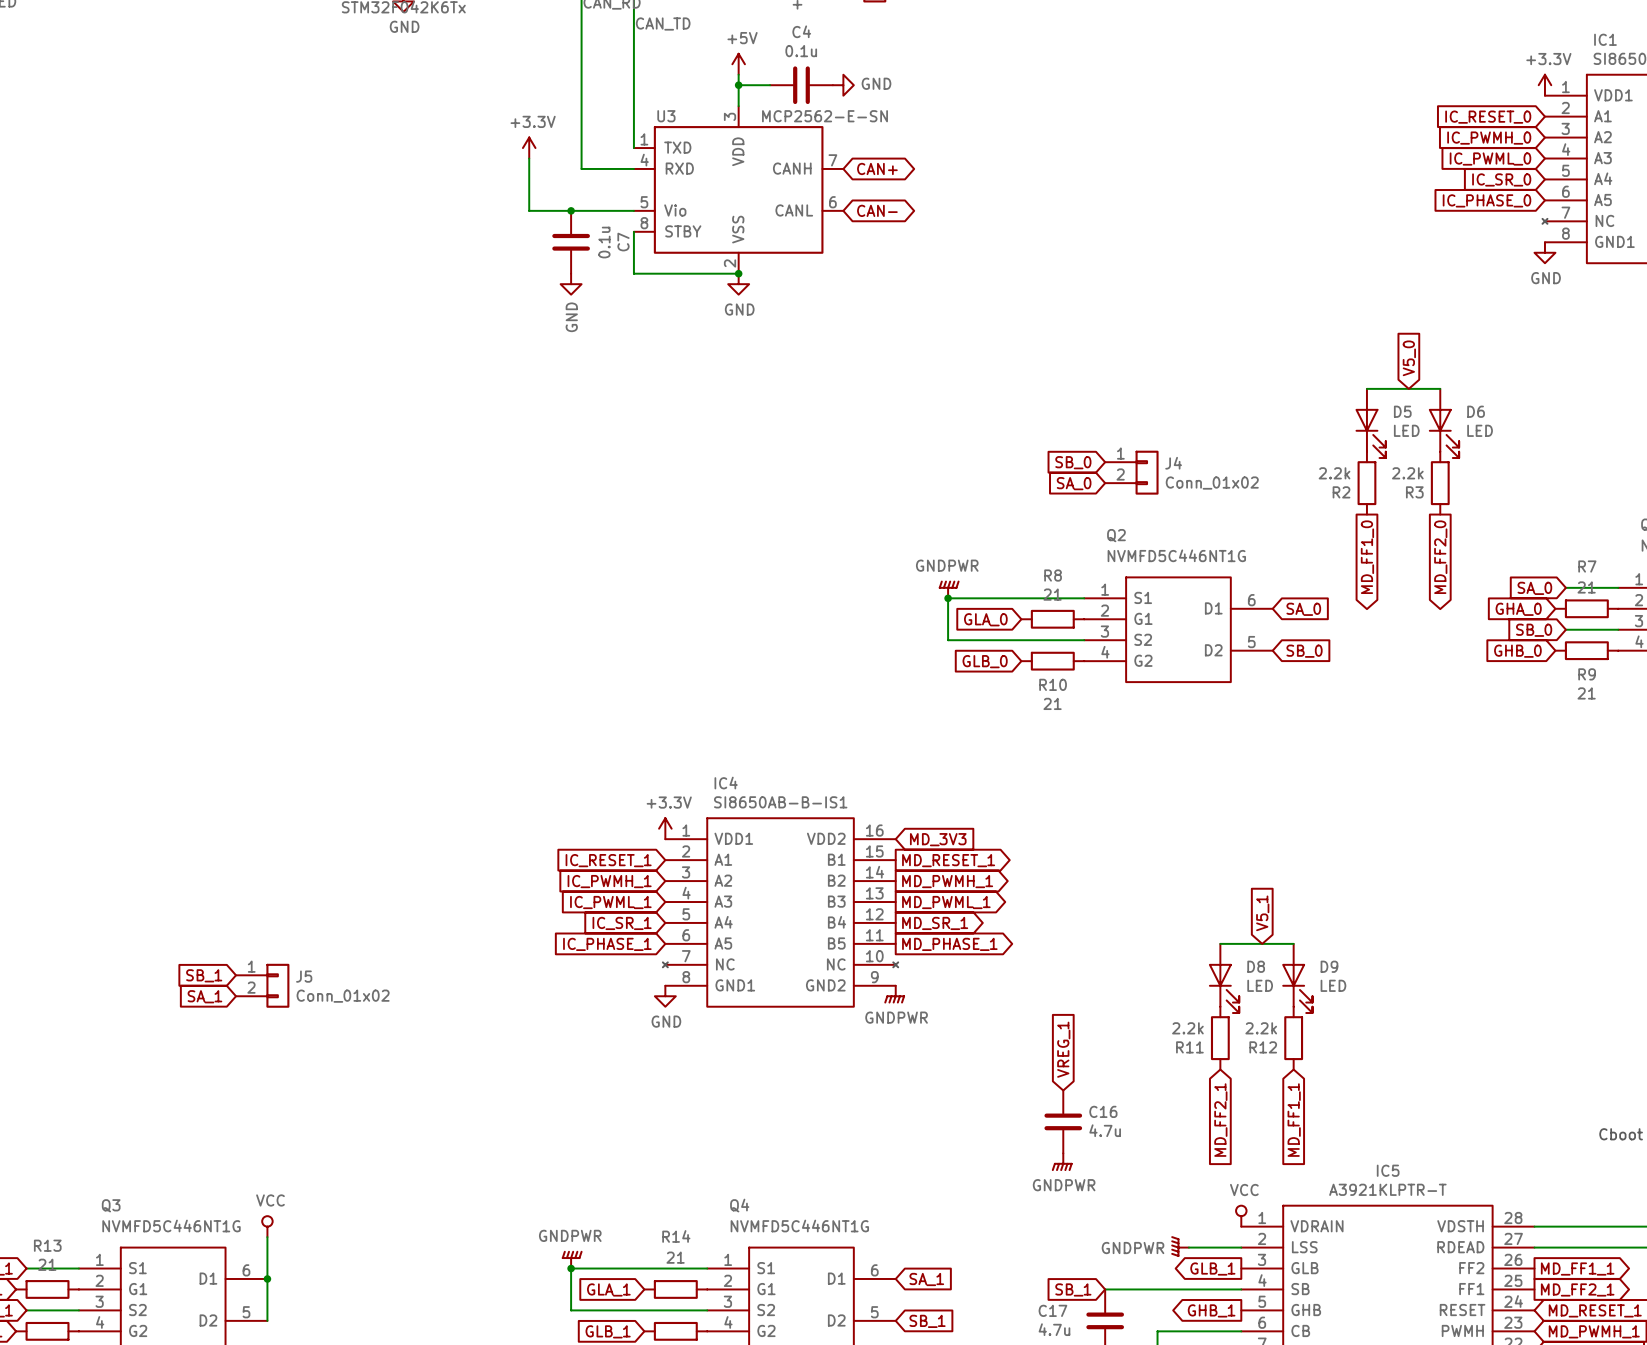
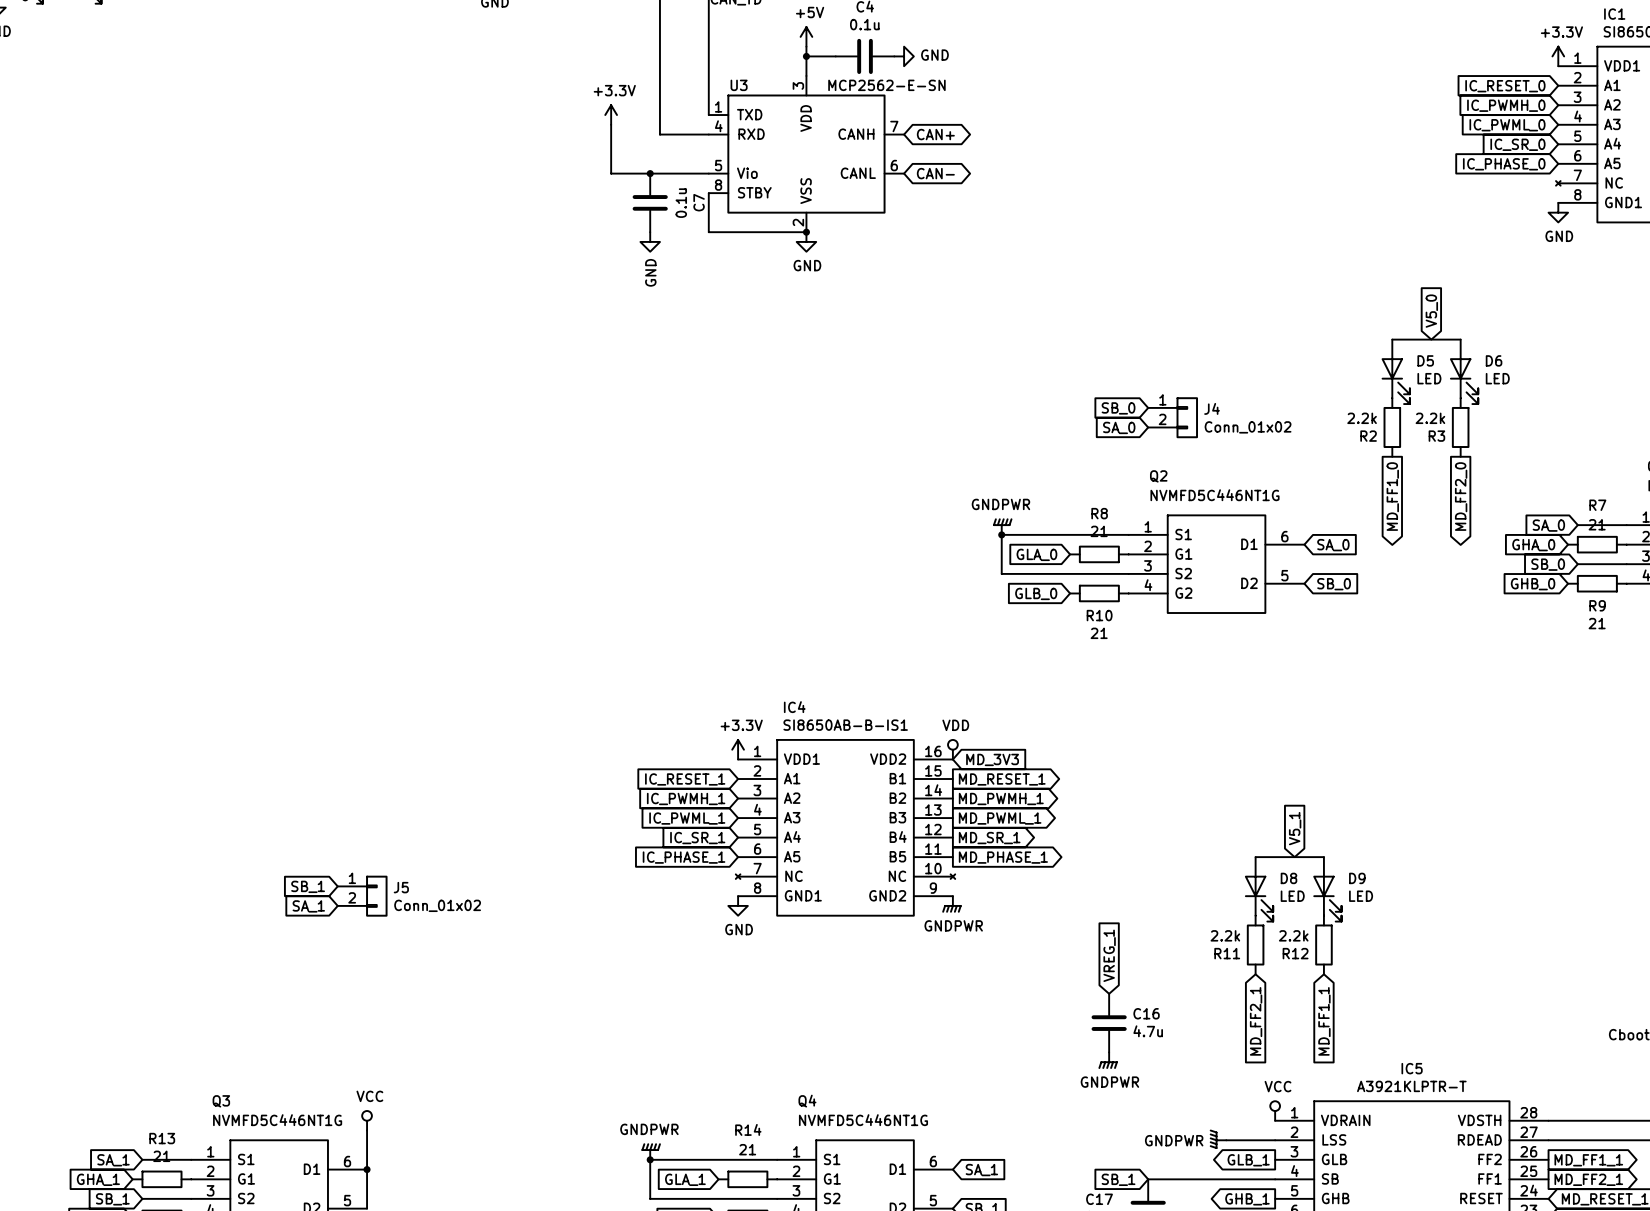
power symbol: none -> VDD (952, 749)

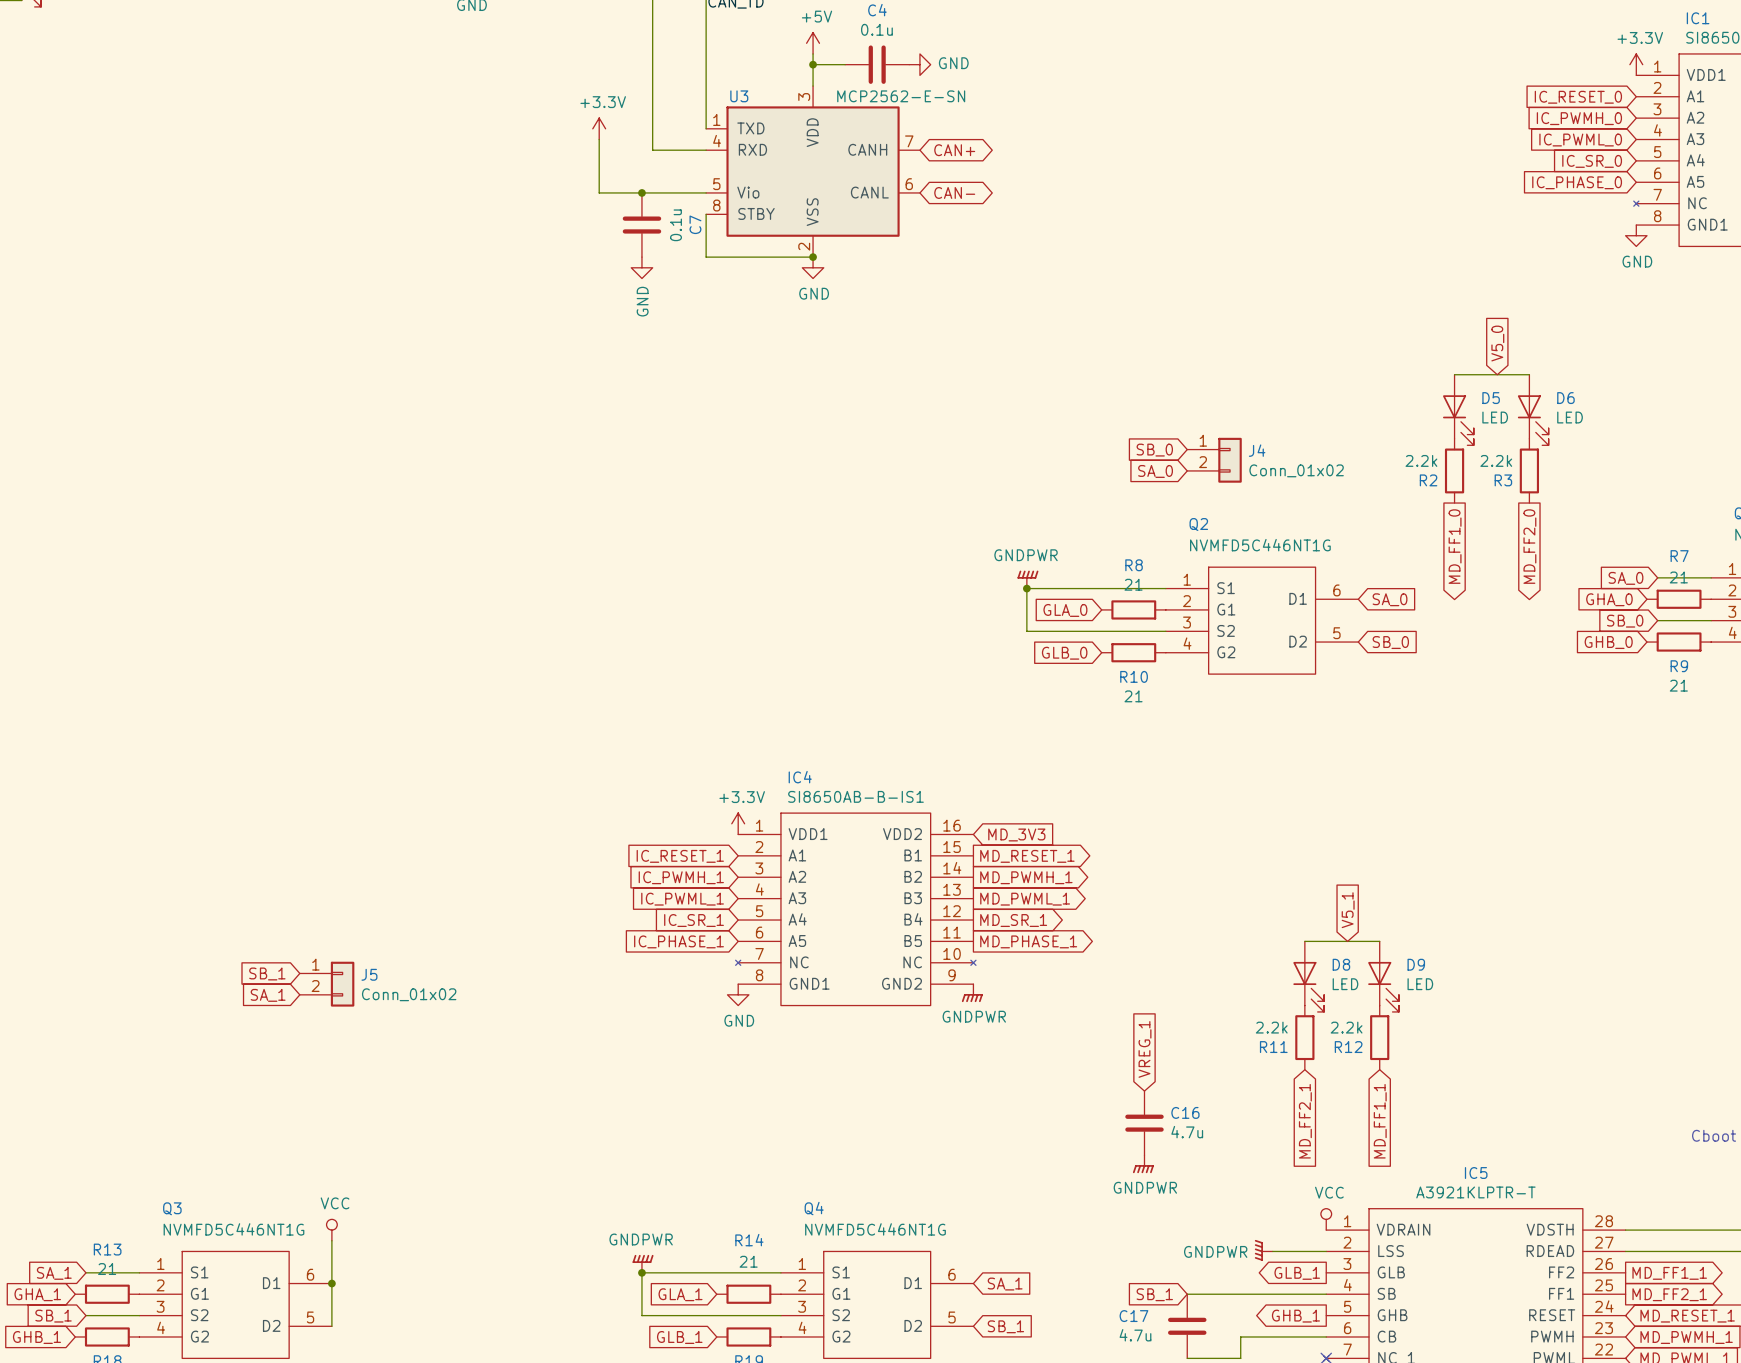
power symbol: VDD (952, 749) -> none

